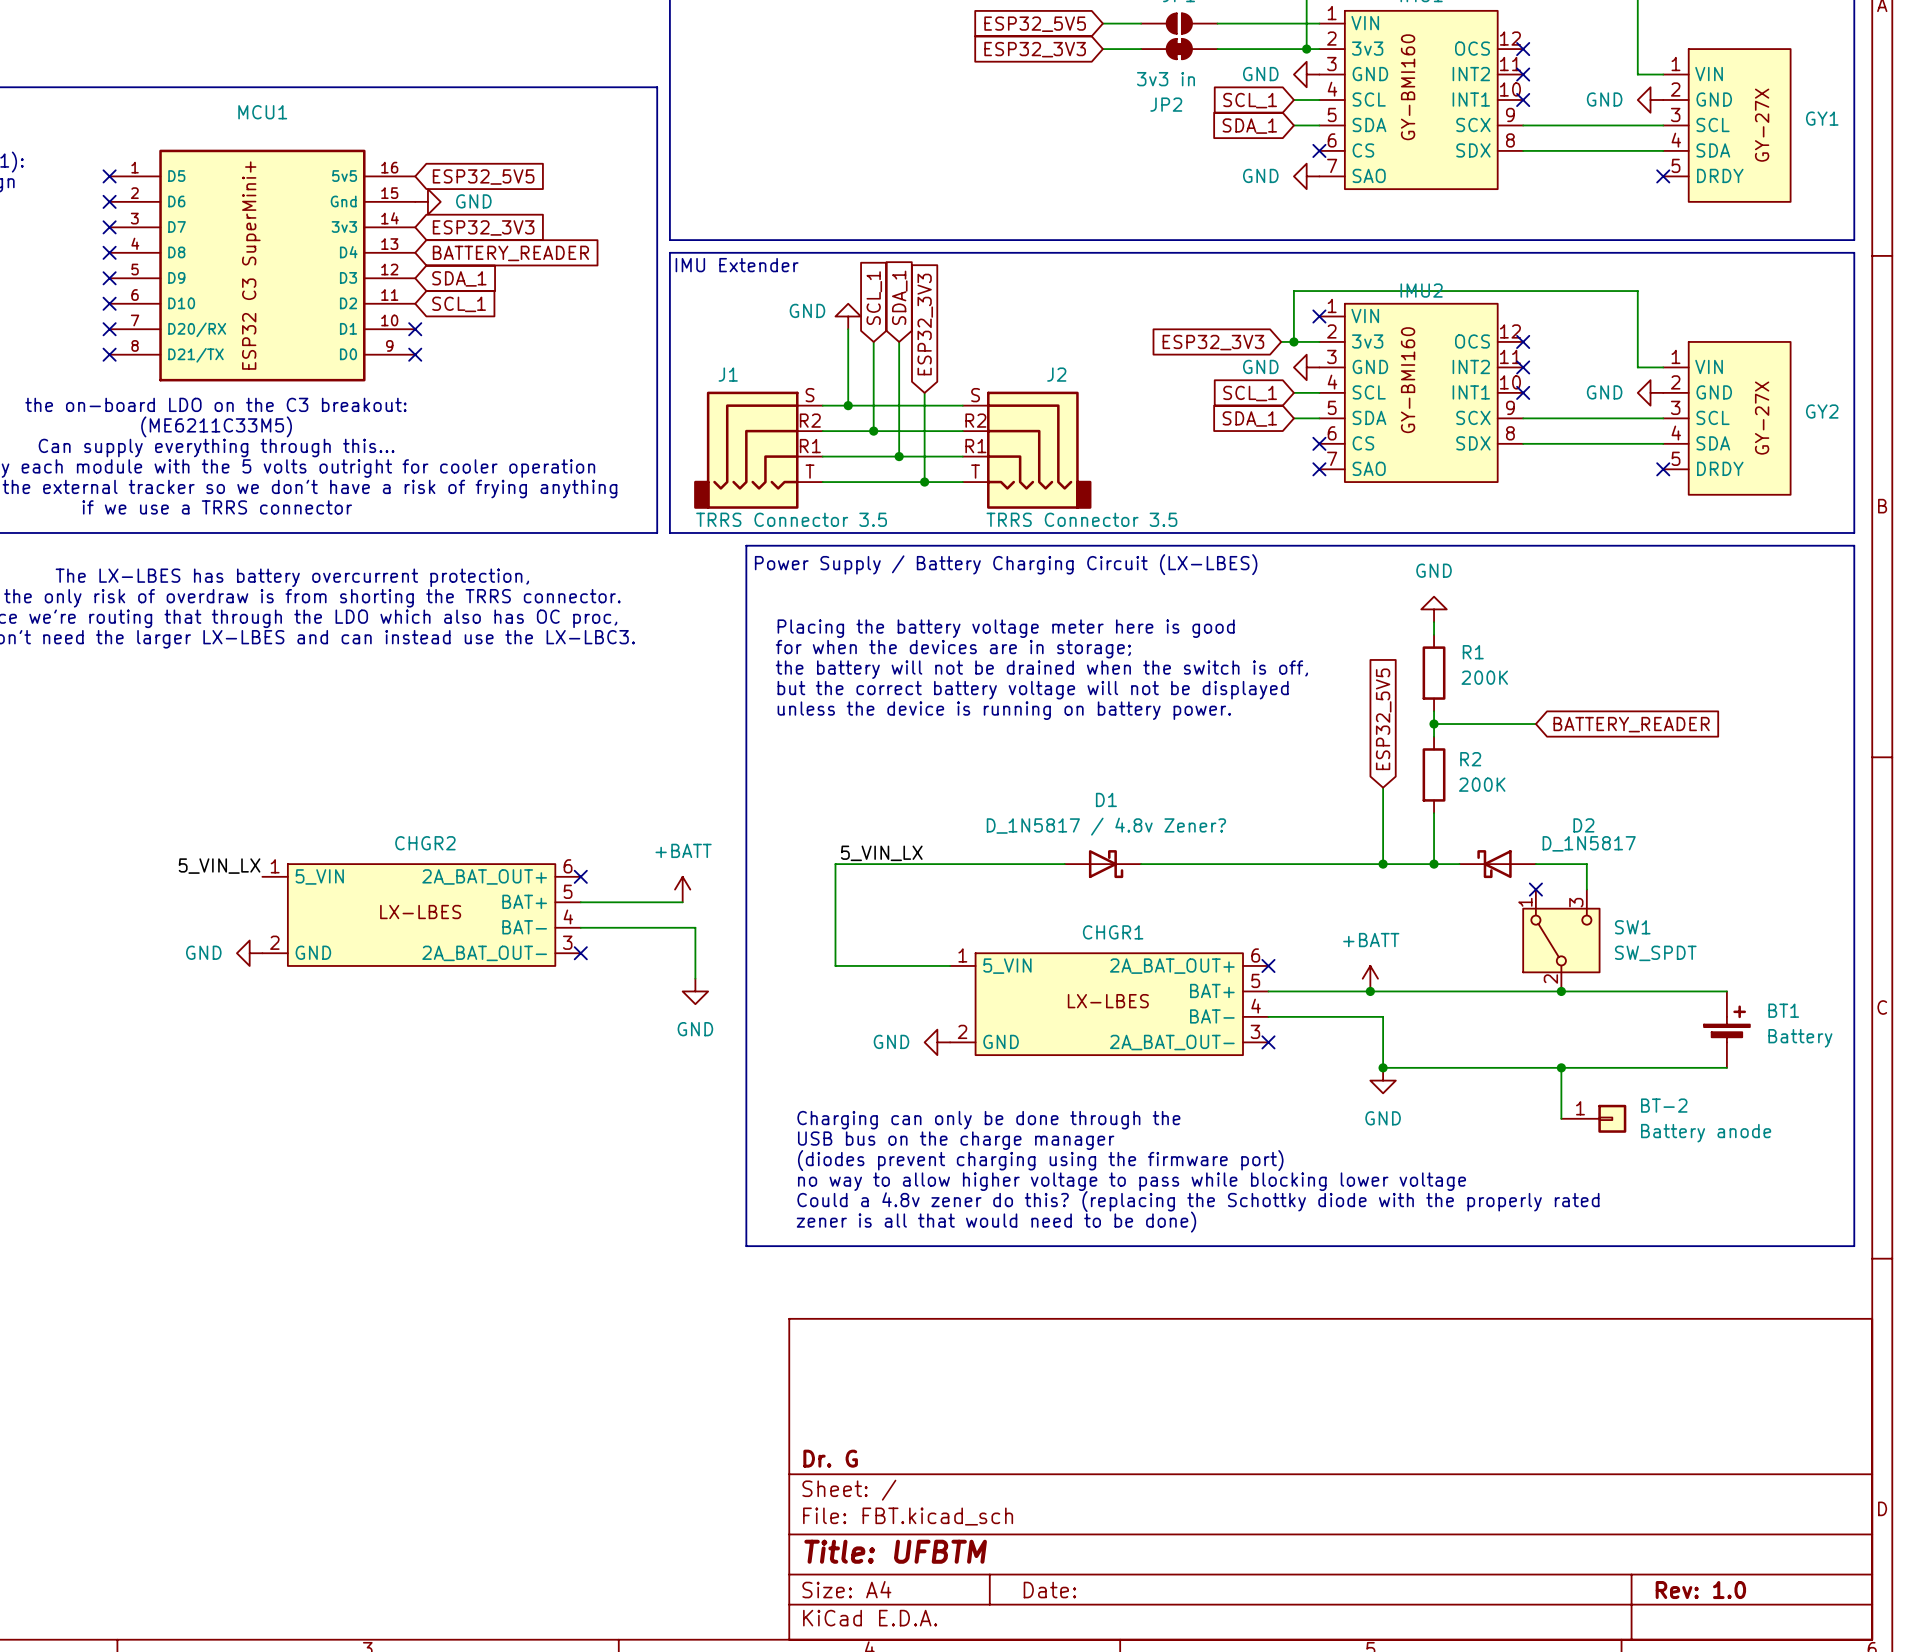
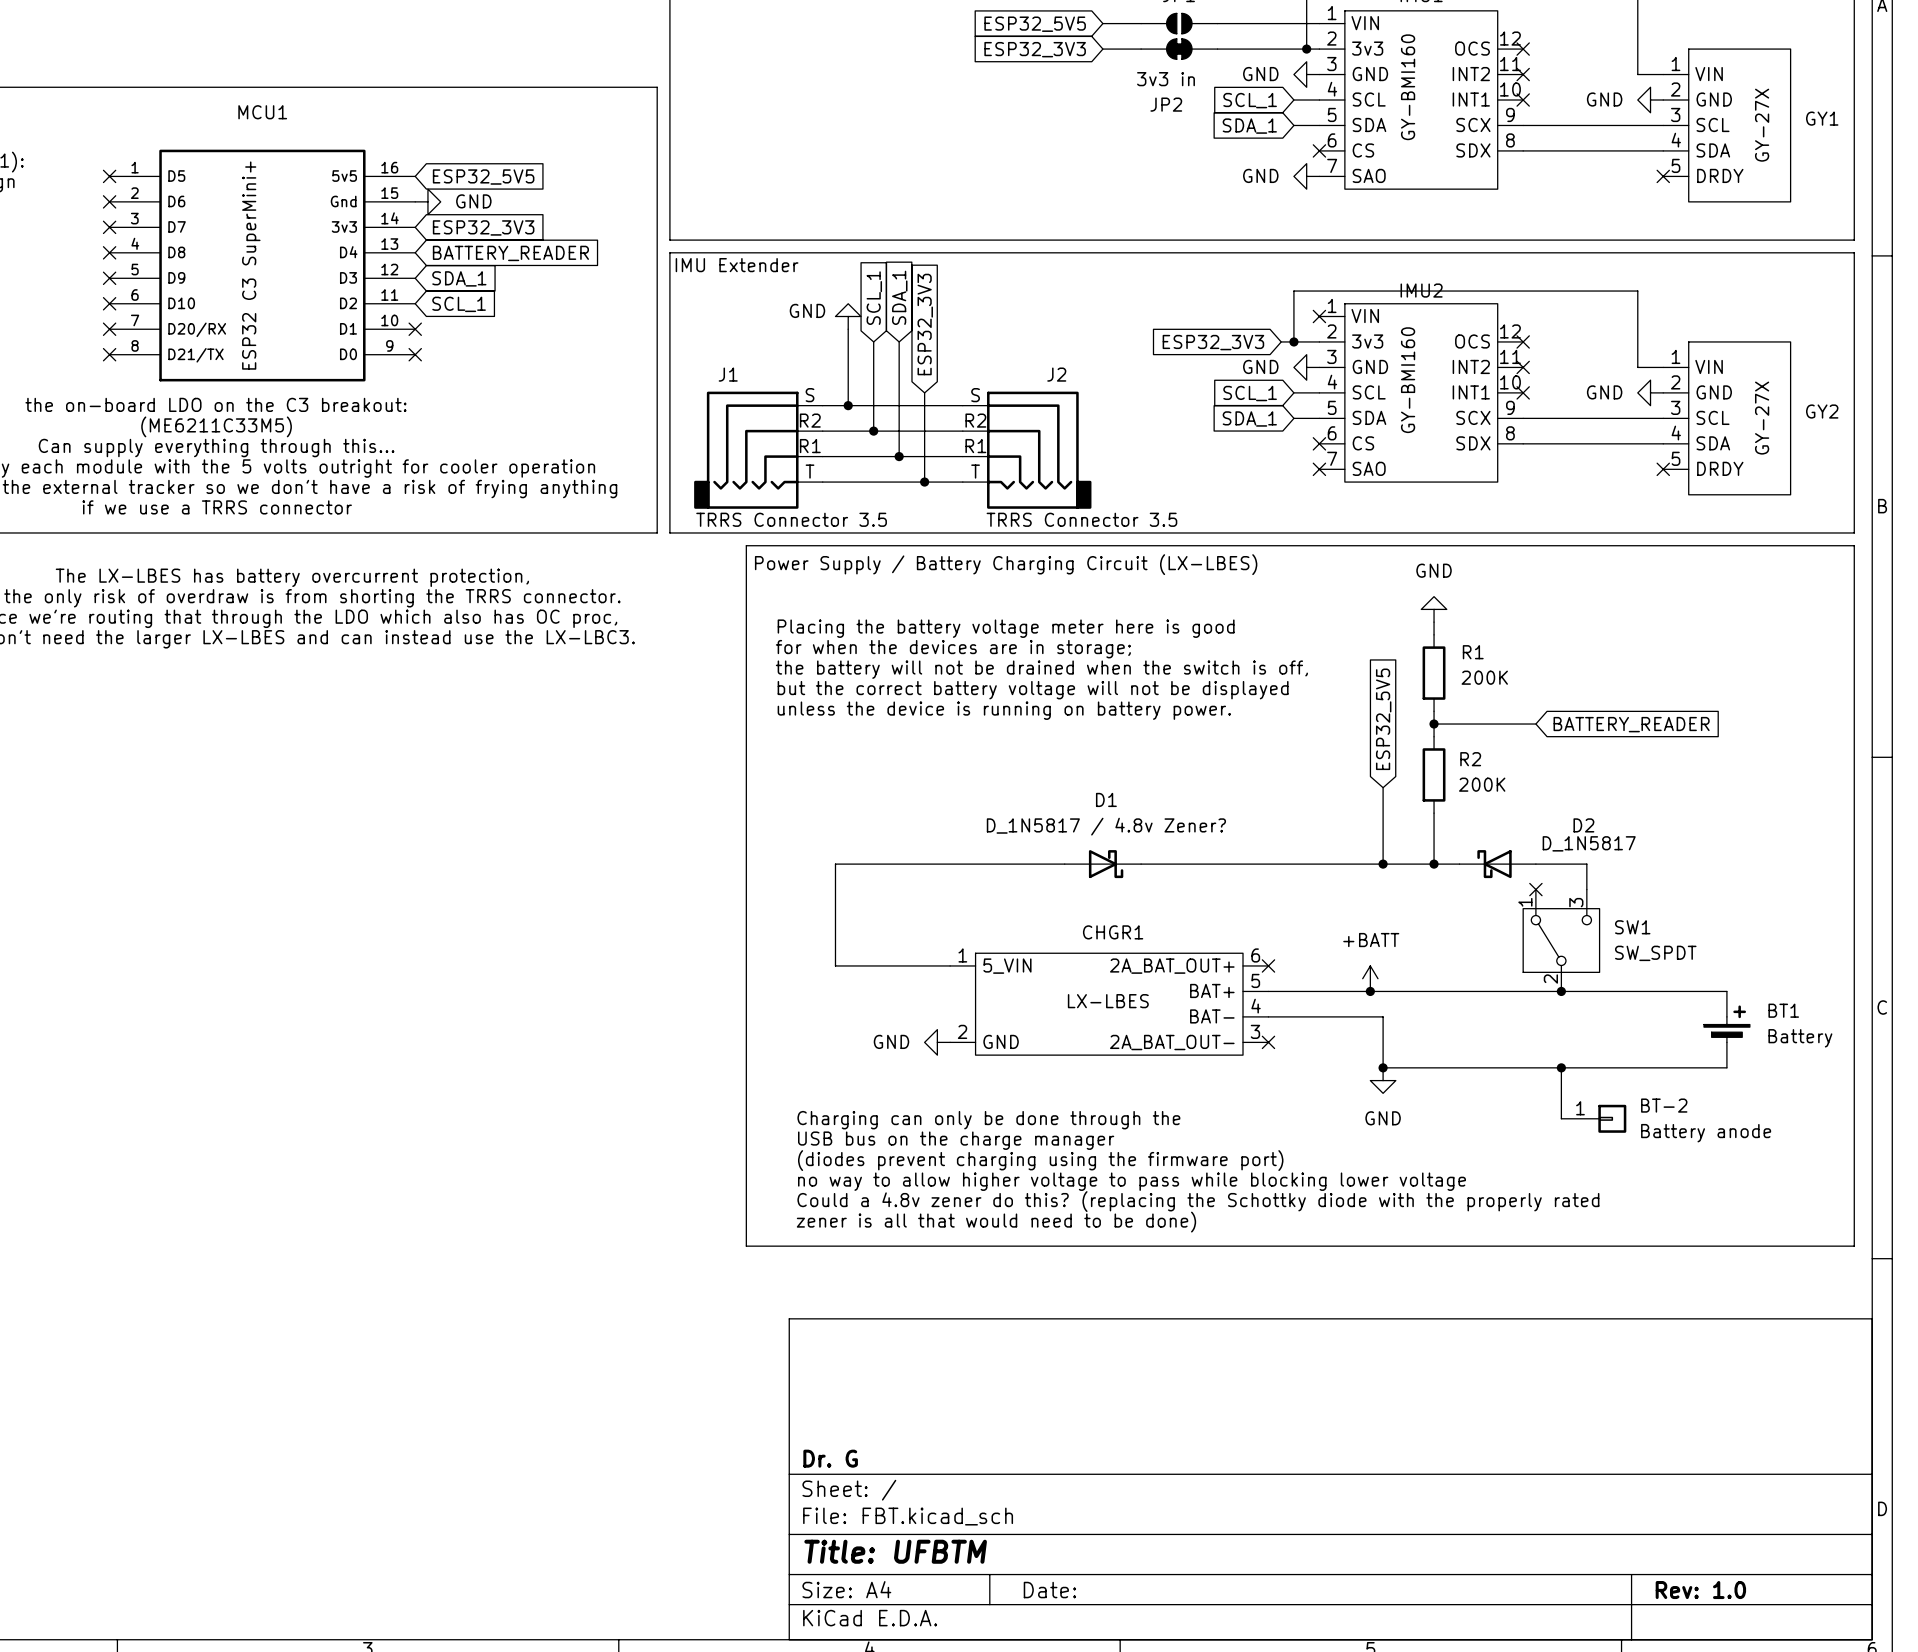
label: 5_VIN_LX (881, 853) -> none
label: 5_VIN_LX (219, 866) -> none
no-connect mark: (580, 876) -> none
power symbol: +BATT (682, 889) -> none
wire: (580, 902) (682, 902) -> none
CHGR2: (421, 915) -> none
wire: (580, 927) (695, 927) (695, 978) -> none
power symbol: GND (249, 953) -> none
no-connect mark: (580, 953) -> none
power symbol: GND (695, 991) -> none

